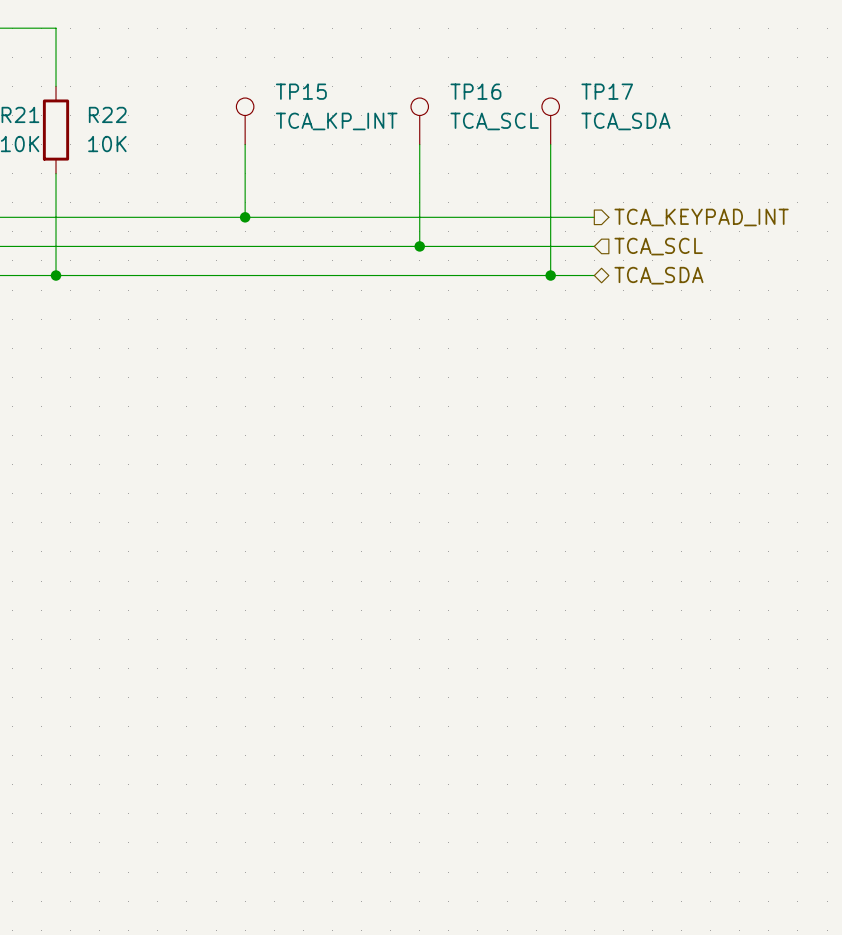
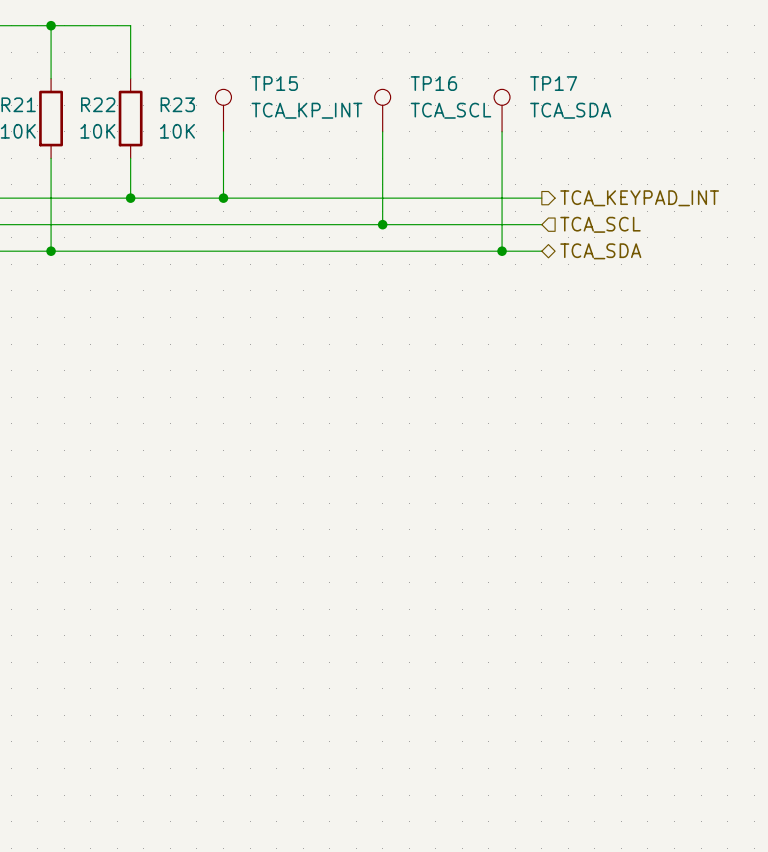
wire: none -> (51, 25) (130, 25) (130, 78)
junction: none -> (51, 25)
R23: none -> 10K (130, 118)
wire: none -> (130, 158) (130, 198)
junction: none -> (130, 198)

